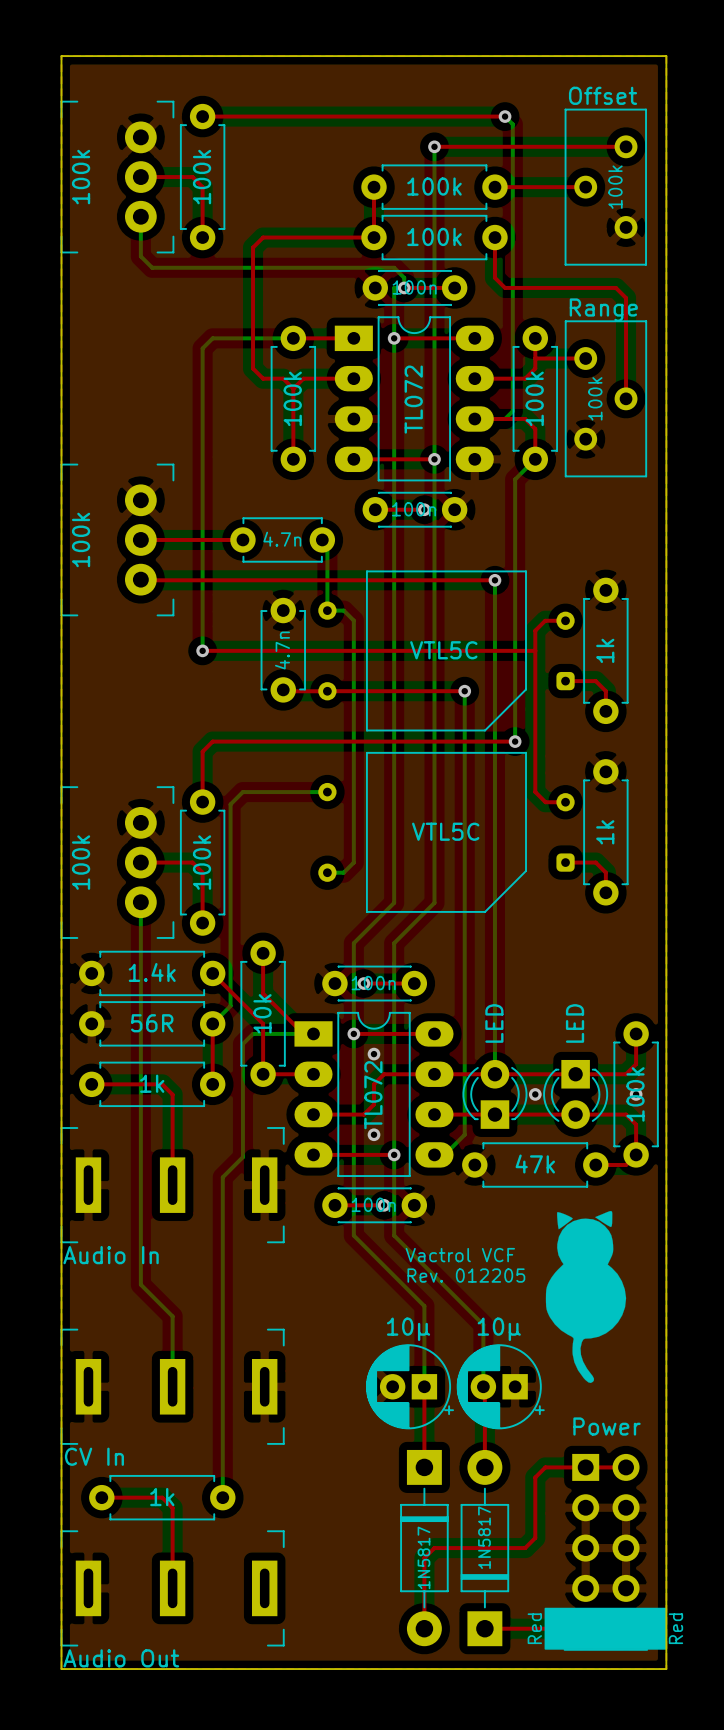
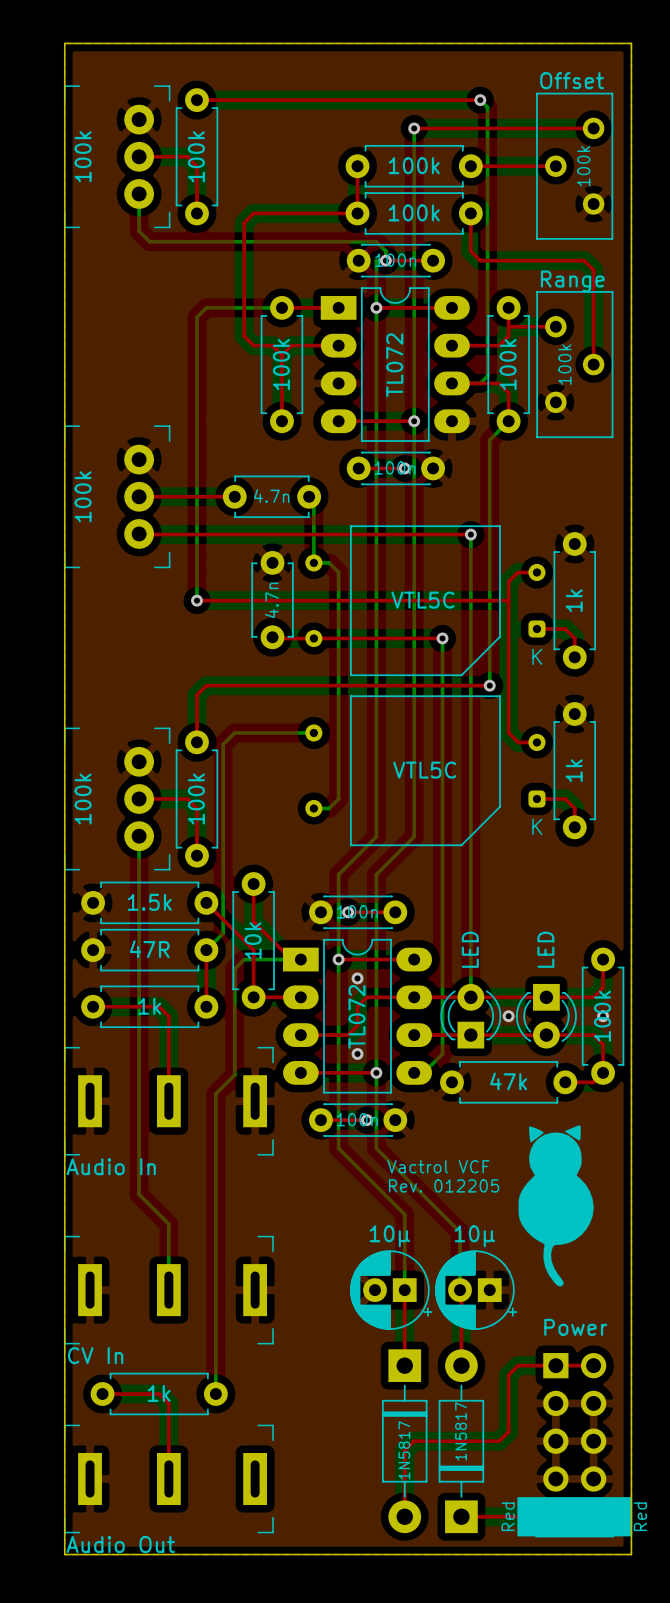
text: none -> K (537, 656)
text: none -> K (537, 826)
part value: 1.4k (152, 972) -> 1.5k (149, 902)
part value: 56R (152, 1023) -> 47R (149, 949)

